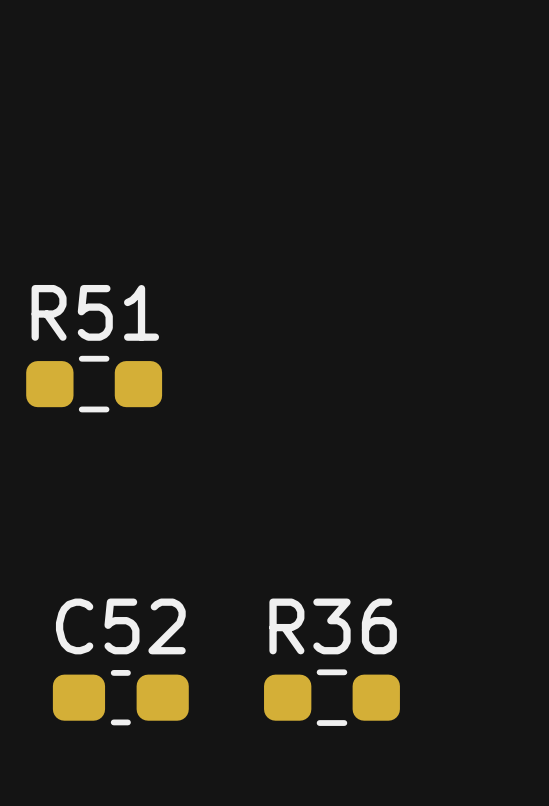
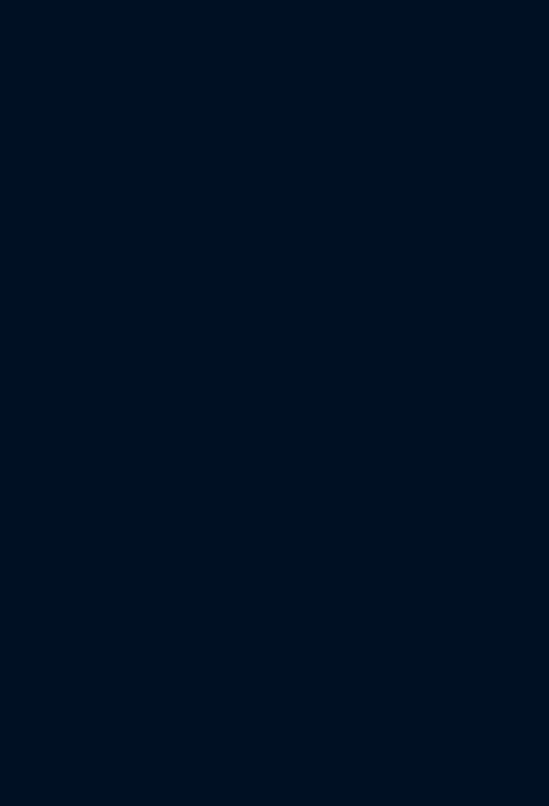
R51: (94, 384) -> none
C52: (120, 697) -> none
R36: (331, 697) -> none

